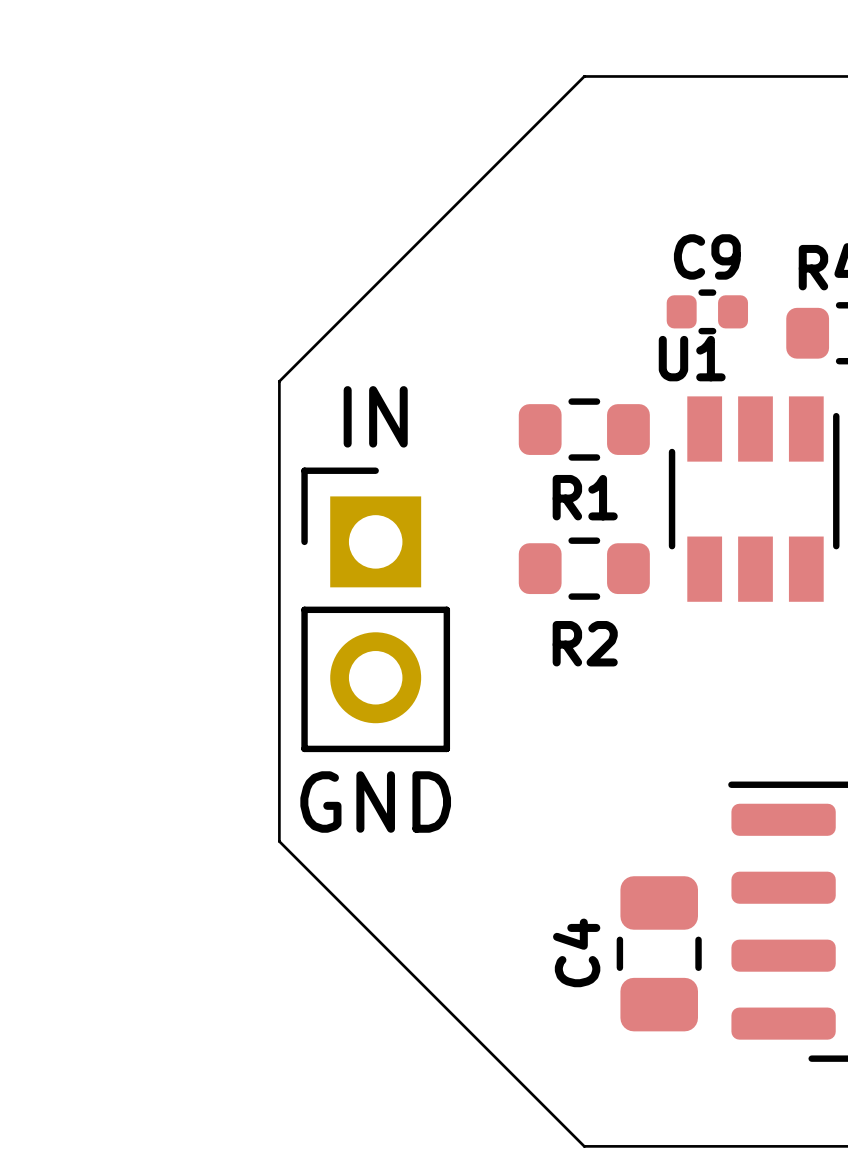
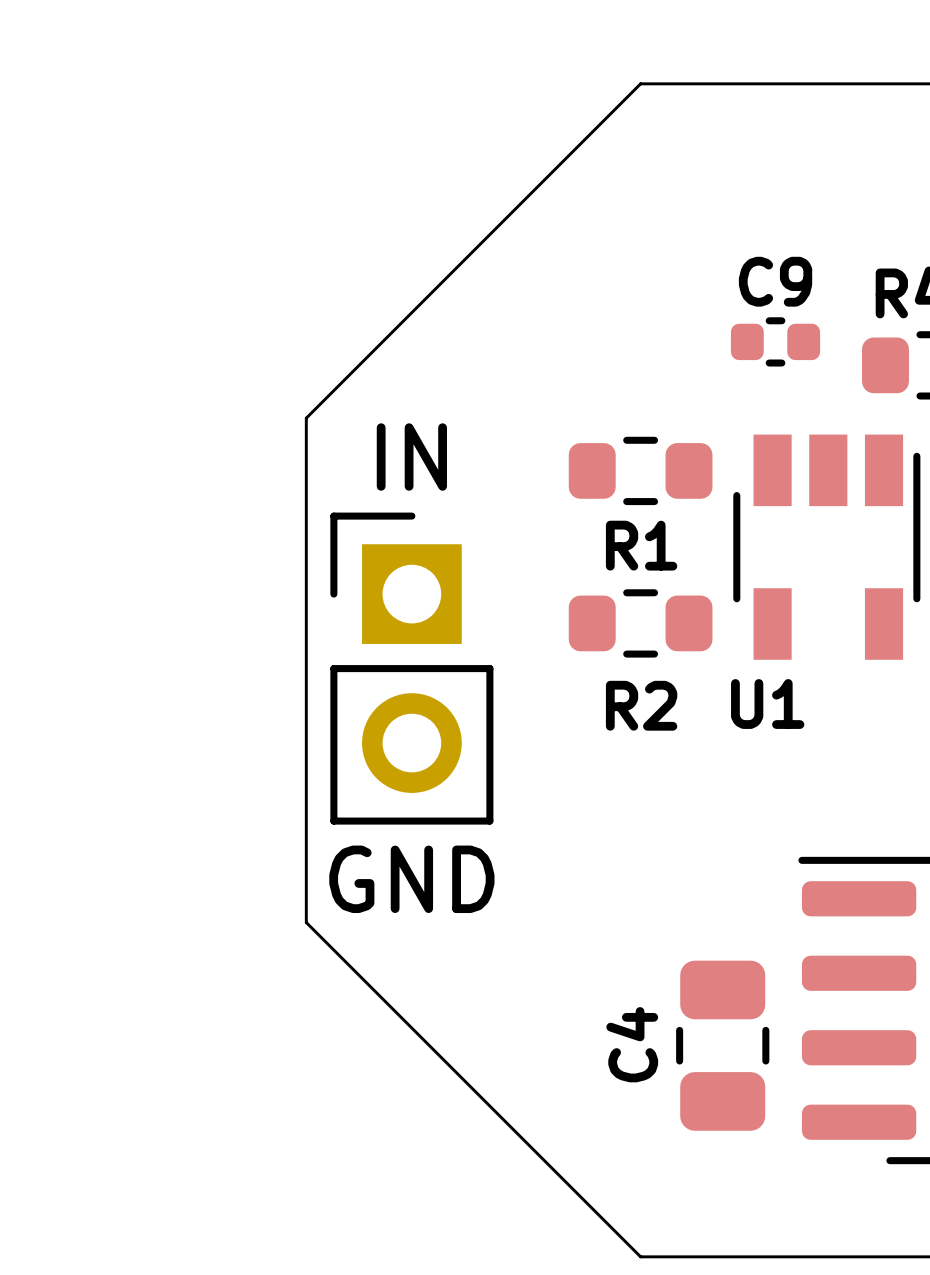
U1 name position: U1 (692, 358) -> U1 (767, 703)
U1 footprint: [668, 396, 840, 602] -> [733, 434, 921, 660]

